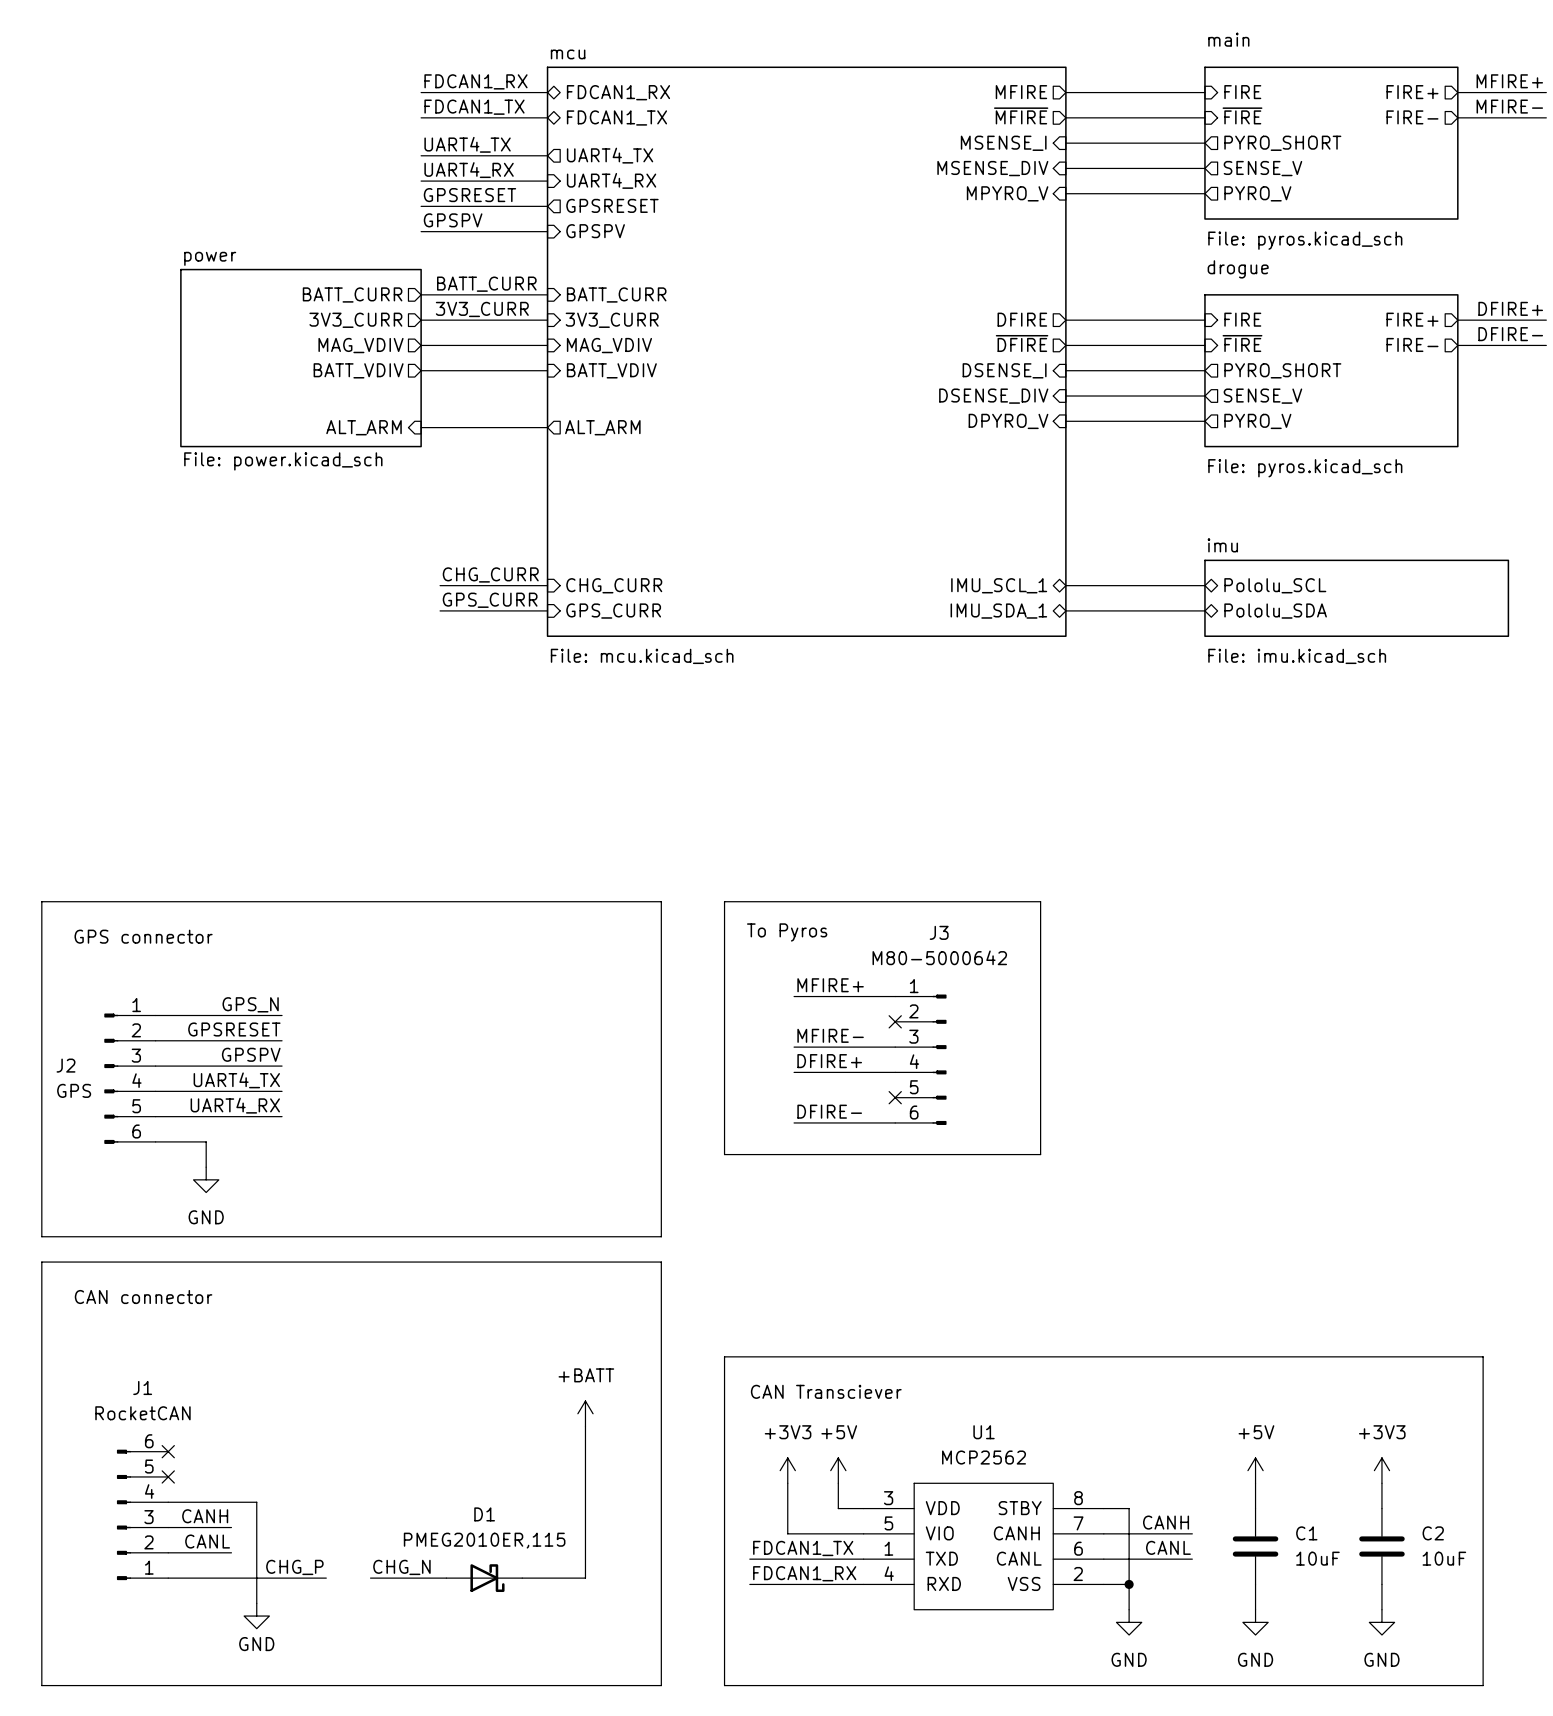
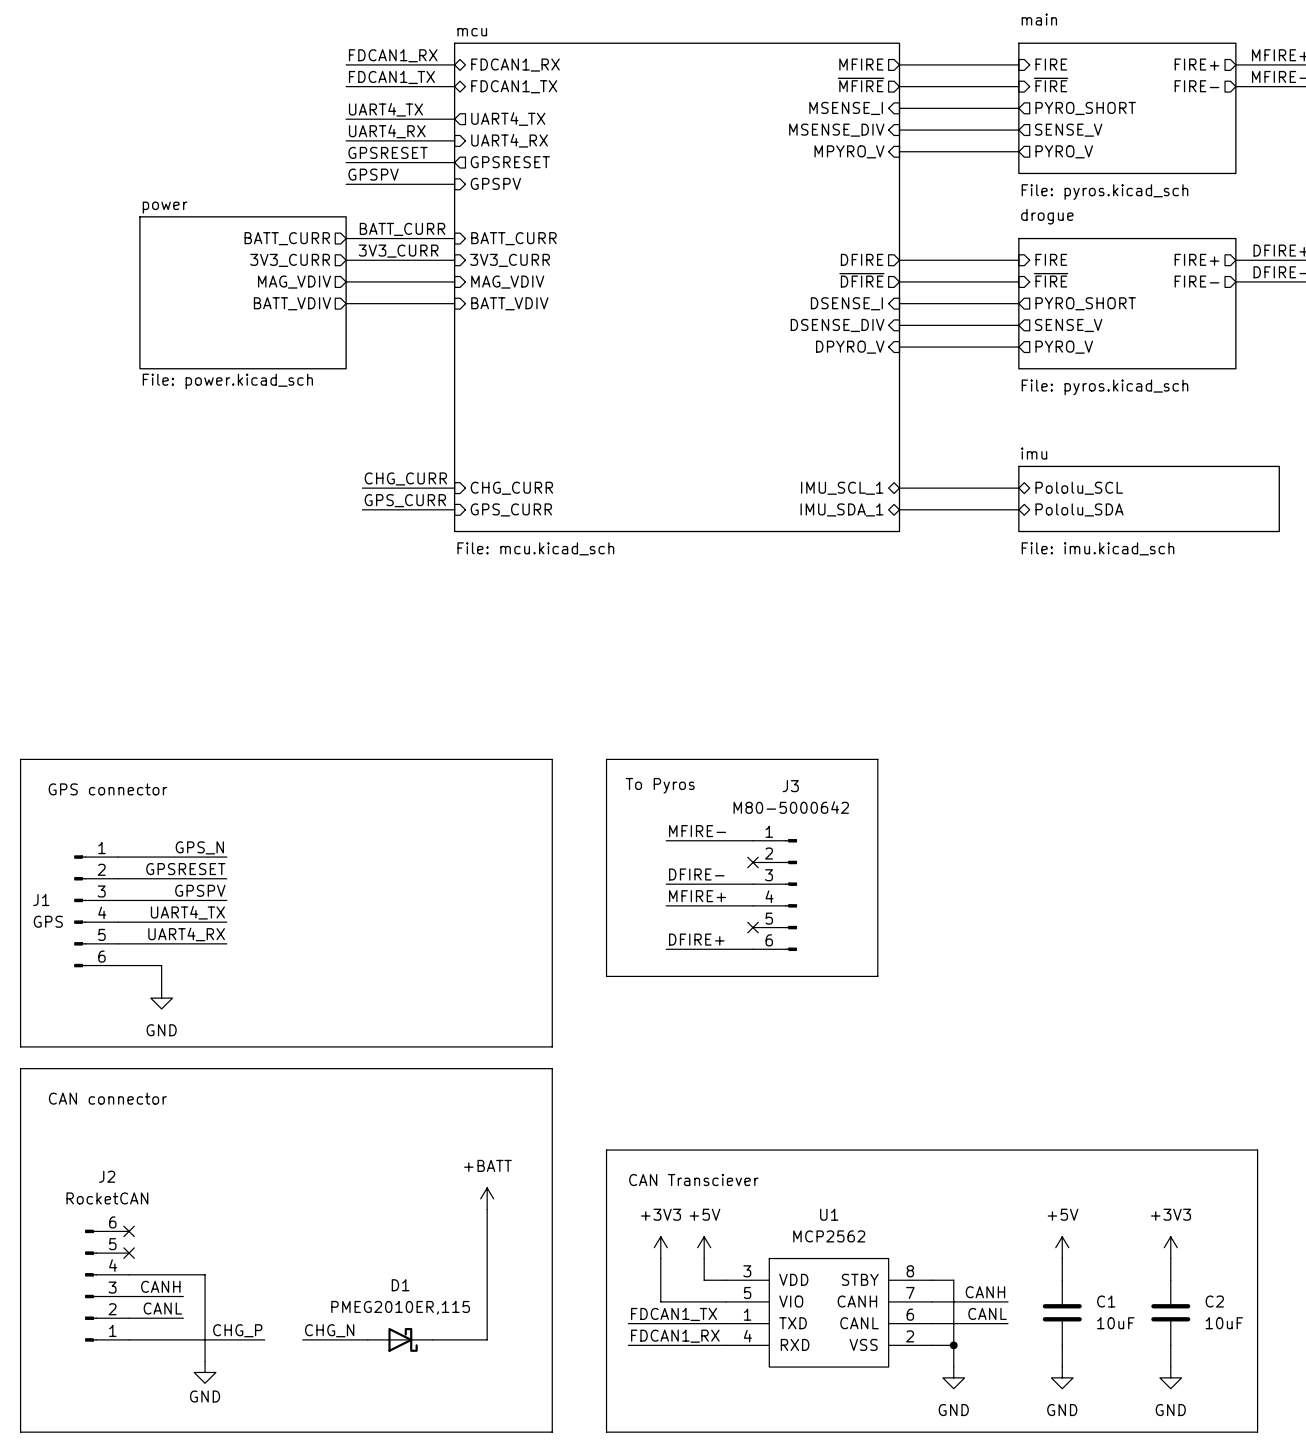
sheet pin: ALT_ARM (364, 427) -> none
wire: (421, 427) (547, 427) -> none
sheet pin: ALT_ARM (602, 427) -> none
label: MFIRE+ (830, 985) -> MFIRE- (697, 831)
label: MFIRE- (830, 1035) -> DFIRE- (696, 874)
label: DFIRE+ (829, 1061) -> MFIRE+ (697, 896)
J2 name: J2 (66, 1065) -> J1 (41, 900)
label: DFIRE- (829, 1111) -> DFIRE+ (696, 939)
J1 name: J1 (142, 1387) -> J2 (107, 1176)

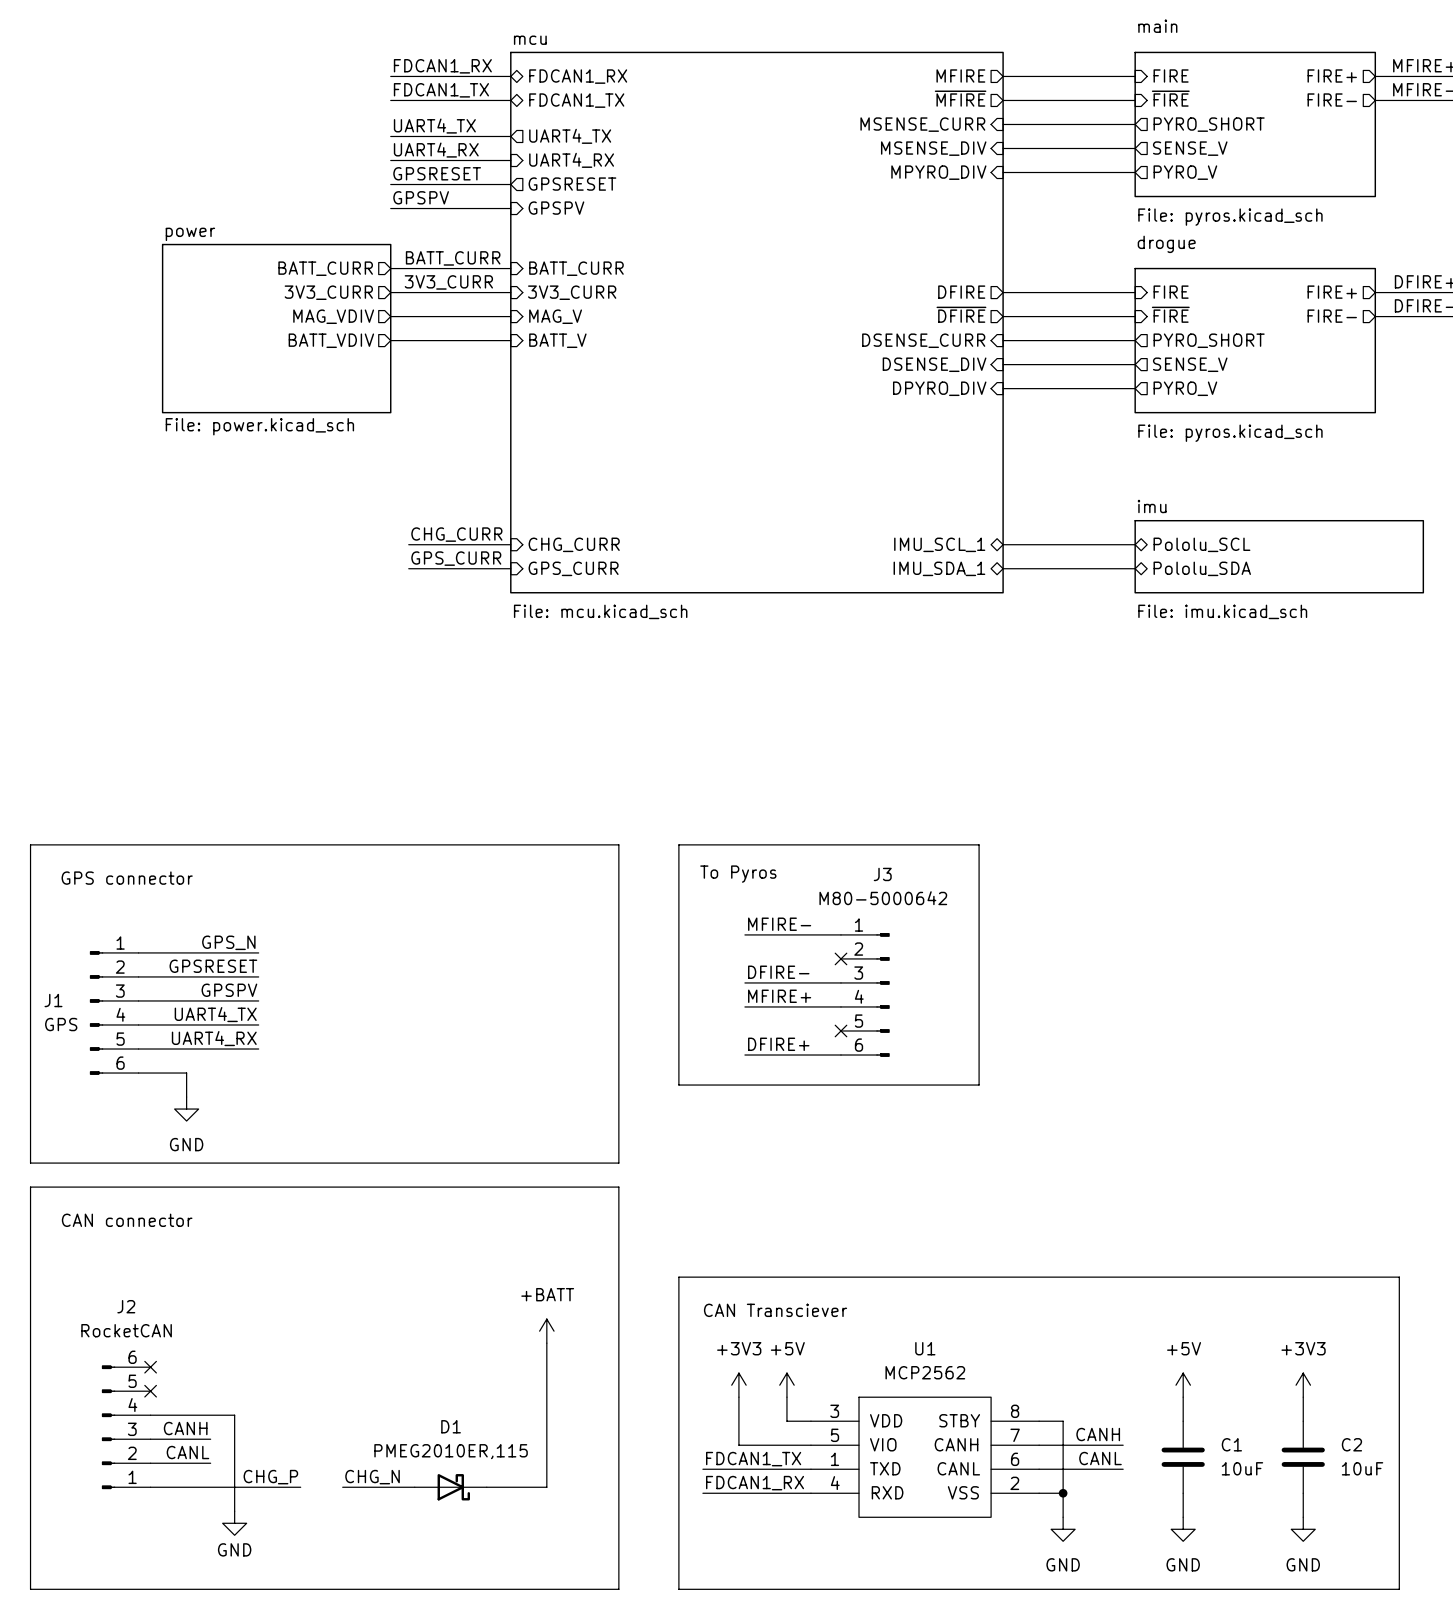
sheet pin: MSENSE_I (846, 108) -> MSENSE_CURR (922, 124)
sheet pin: MPYRO_V (849, 151) -> MPYRO_DIV (938, 172)
sheet pin: MAG_VDIV (507, 282) -> MAG_V (555, 316)
sheet pin: BATT_VDIV (509, 303) -> BATT_V (557, 340)
sheet pin: DSENSE_I (846, 303) -> DSENSE_CURR (923, 340)
sheet pin: DPYRO_V (850, 347) -> DPYRO_DIV (939, 388)

